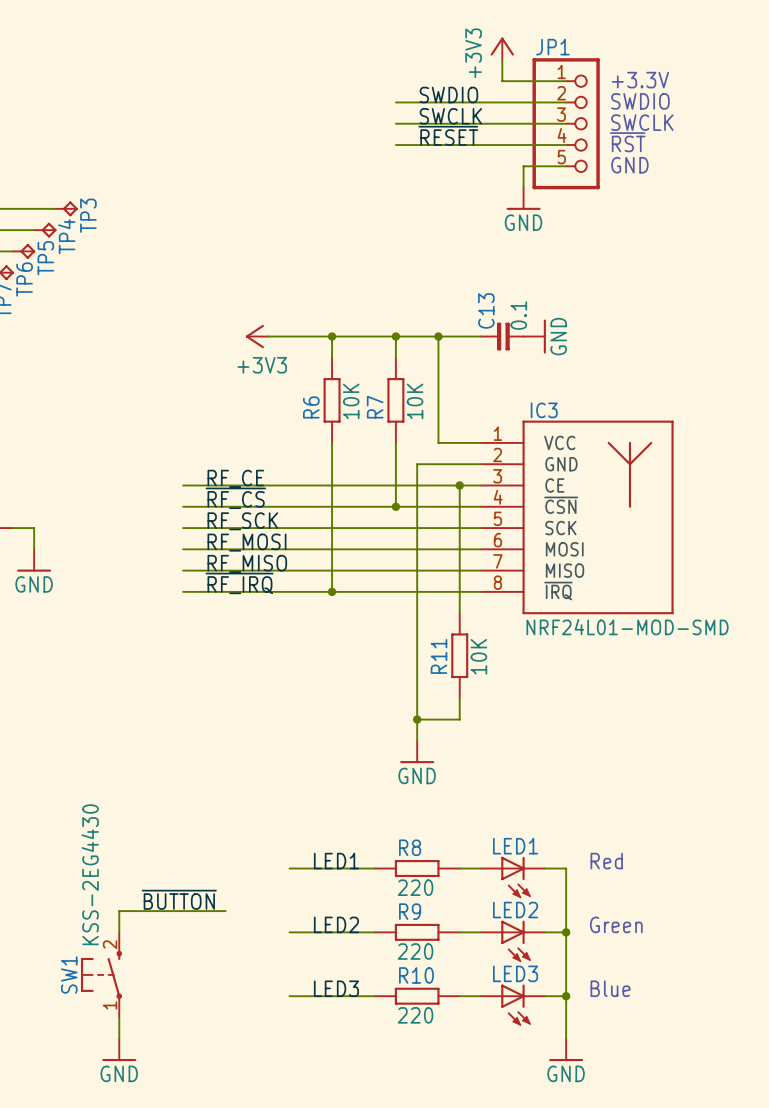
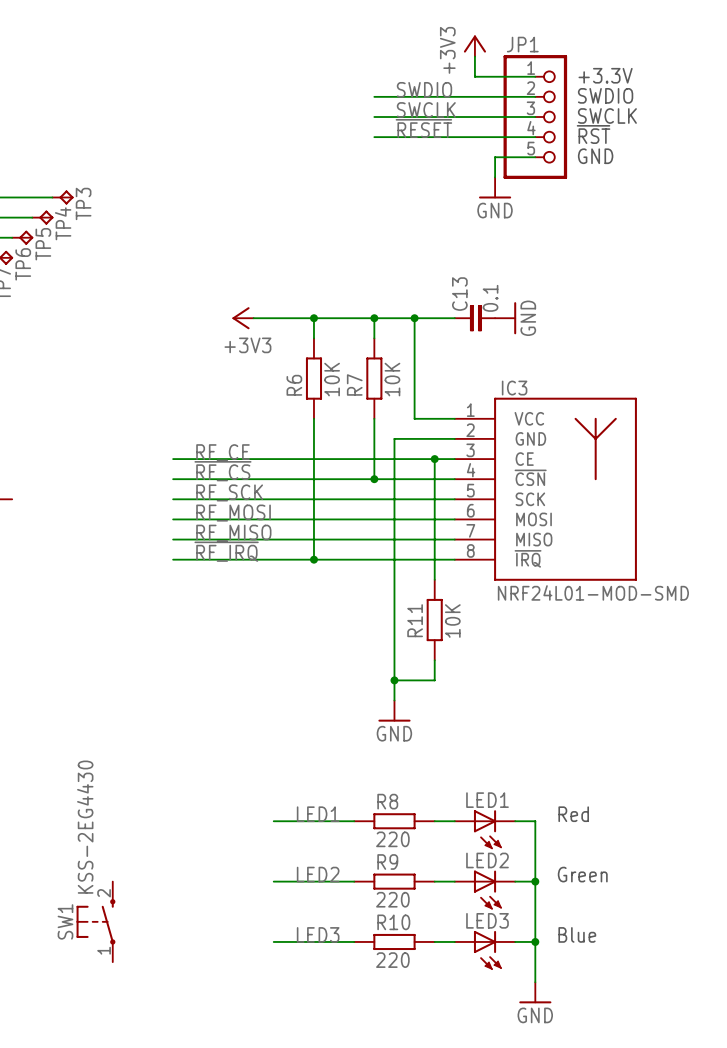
wire: (12, 528) (34, 528) (34, 549) -> none
power symbol: GND (34, 560) -> none
label: ~{BUTTON} (179, 899) -> none
wire: (225, 911) (119, 911) (119, 932) -> none
wire: (119, 1017) (119, 1038) -> none
power symbol: GND (119, 1049) -> none

